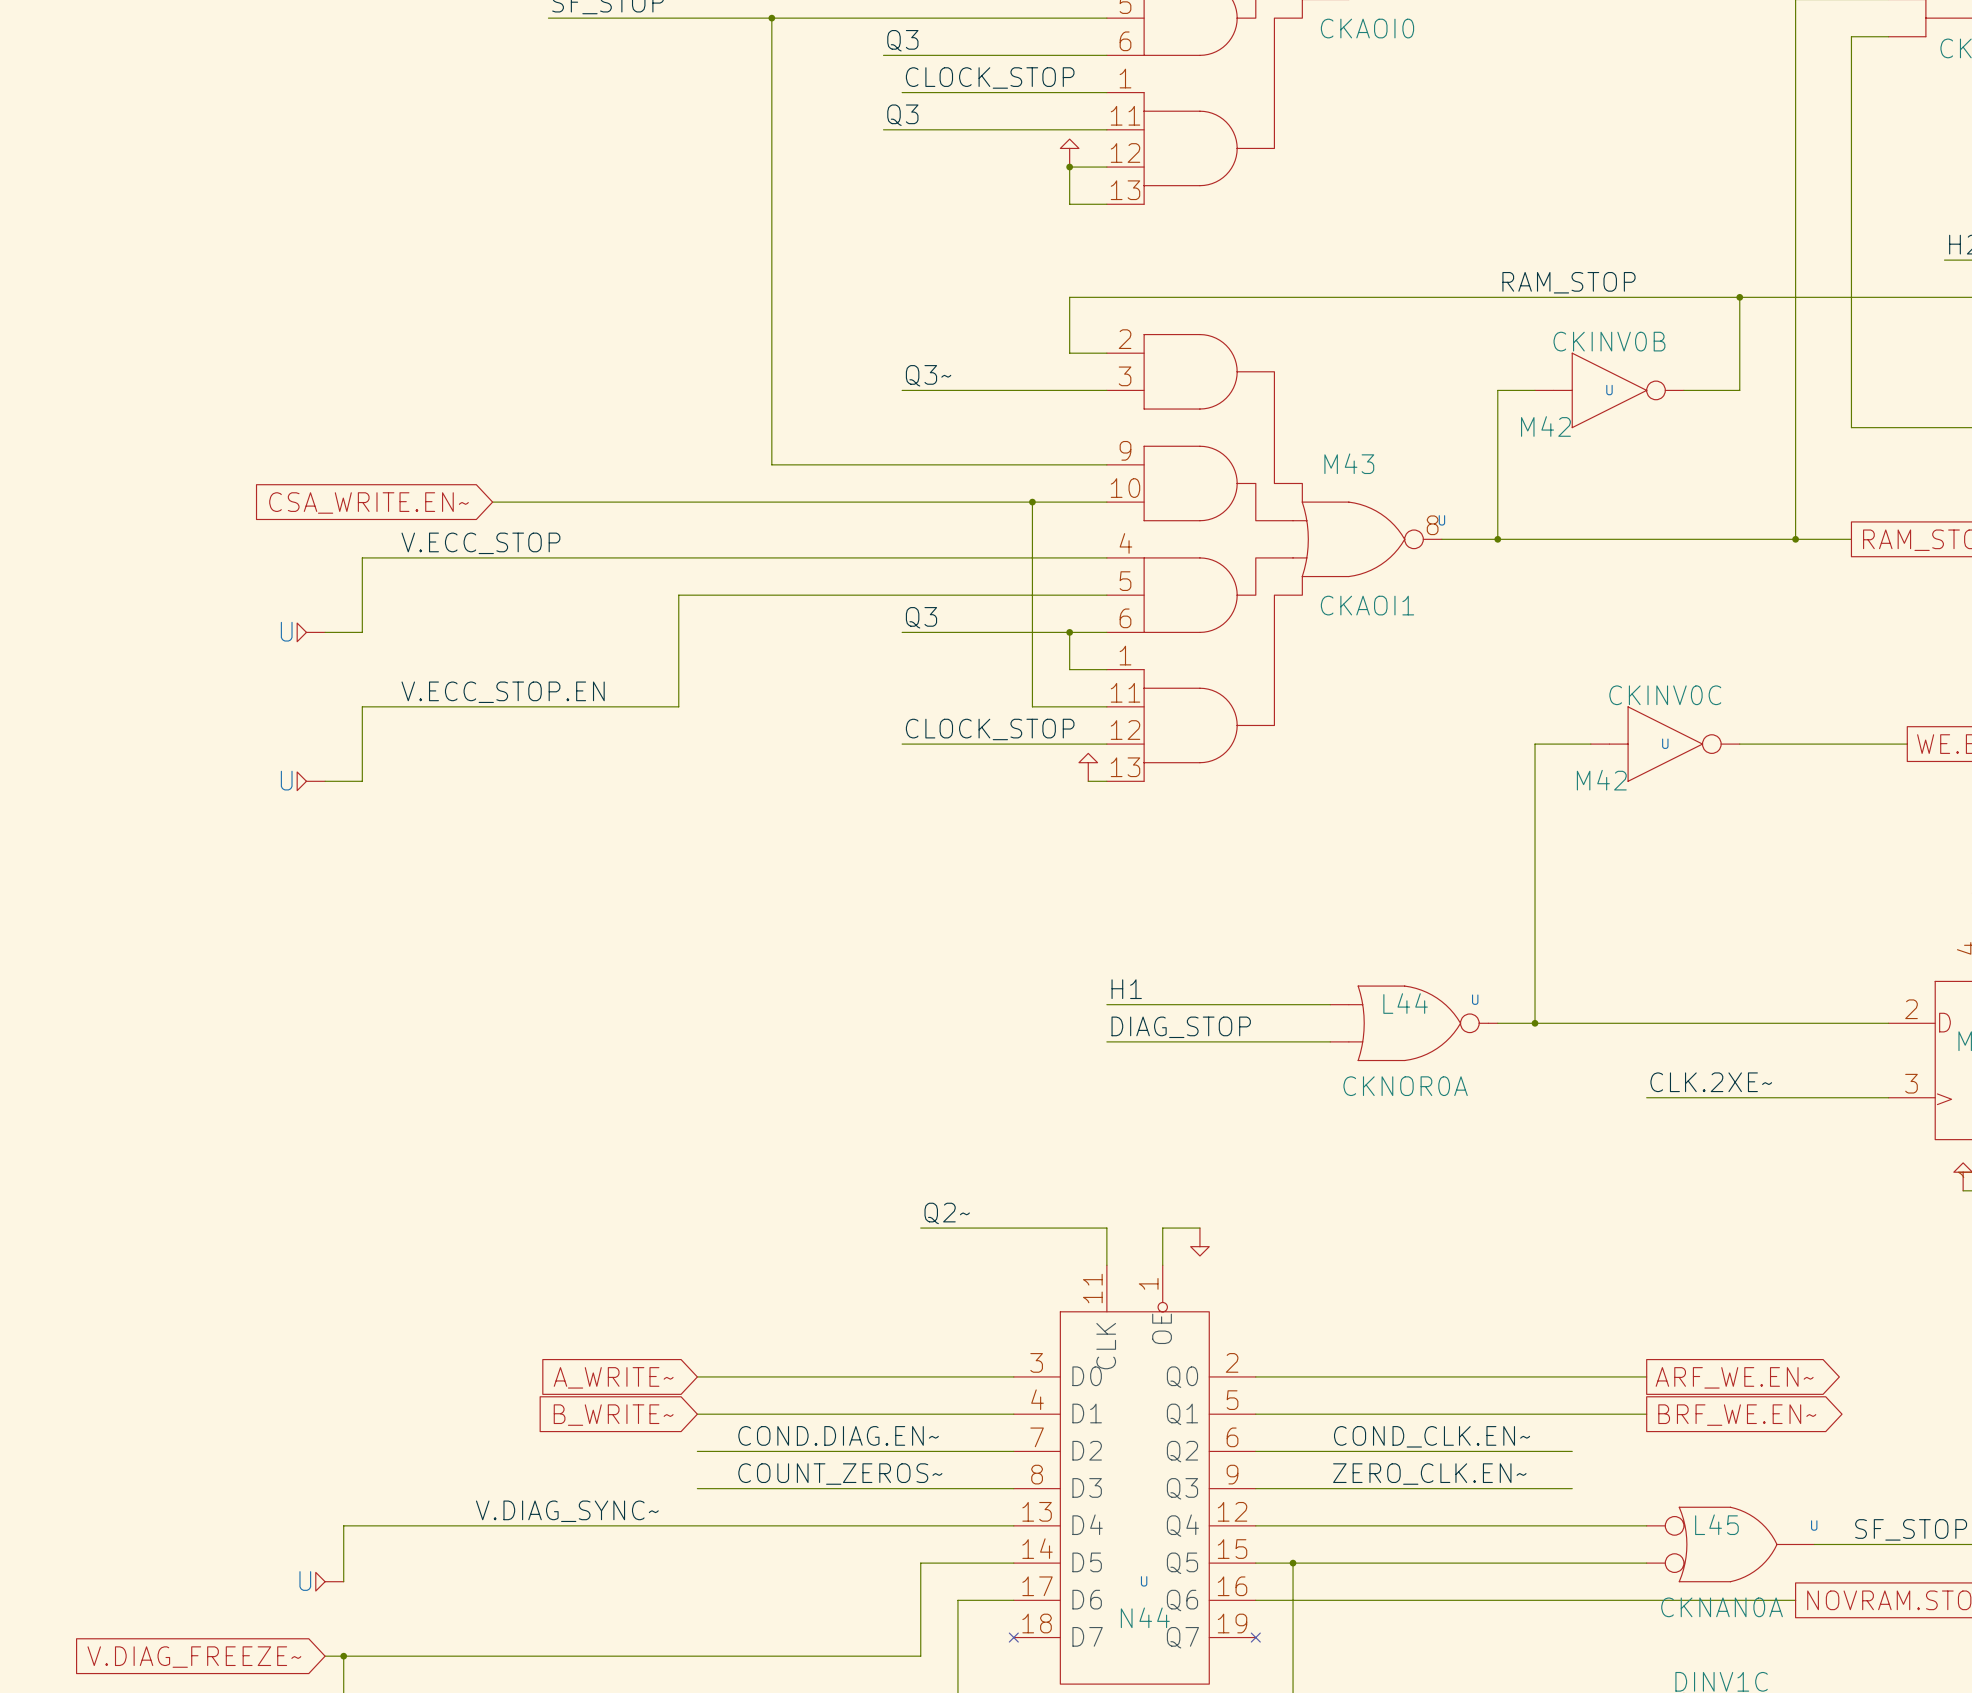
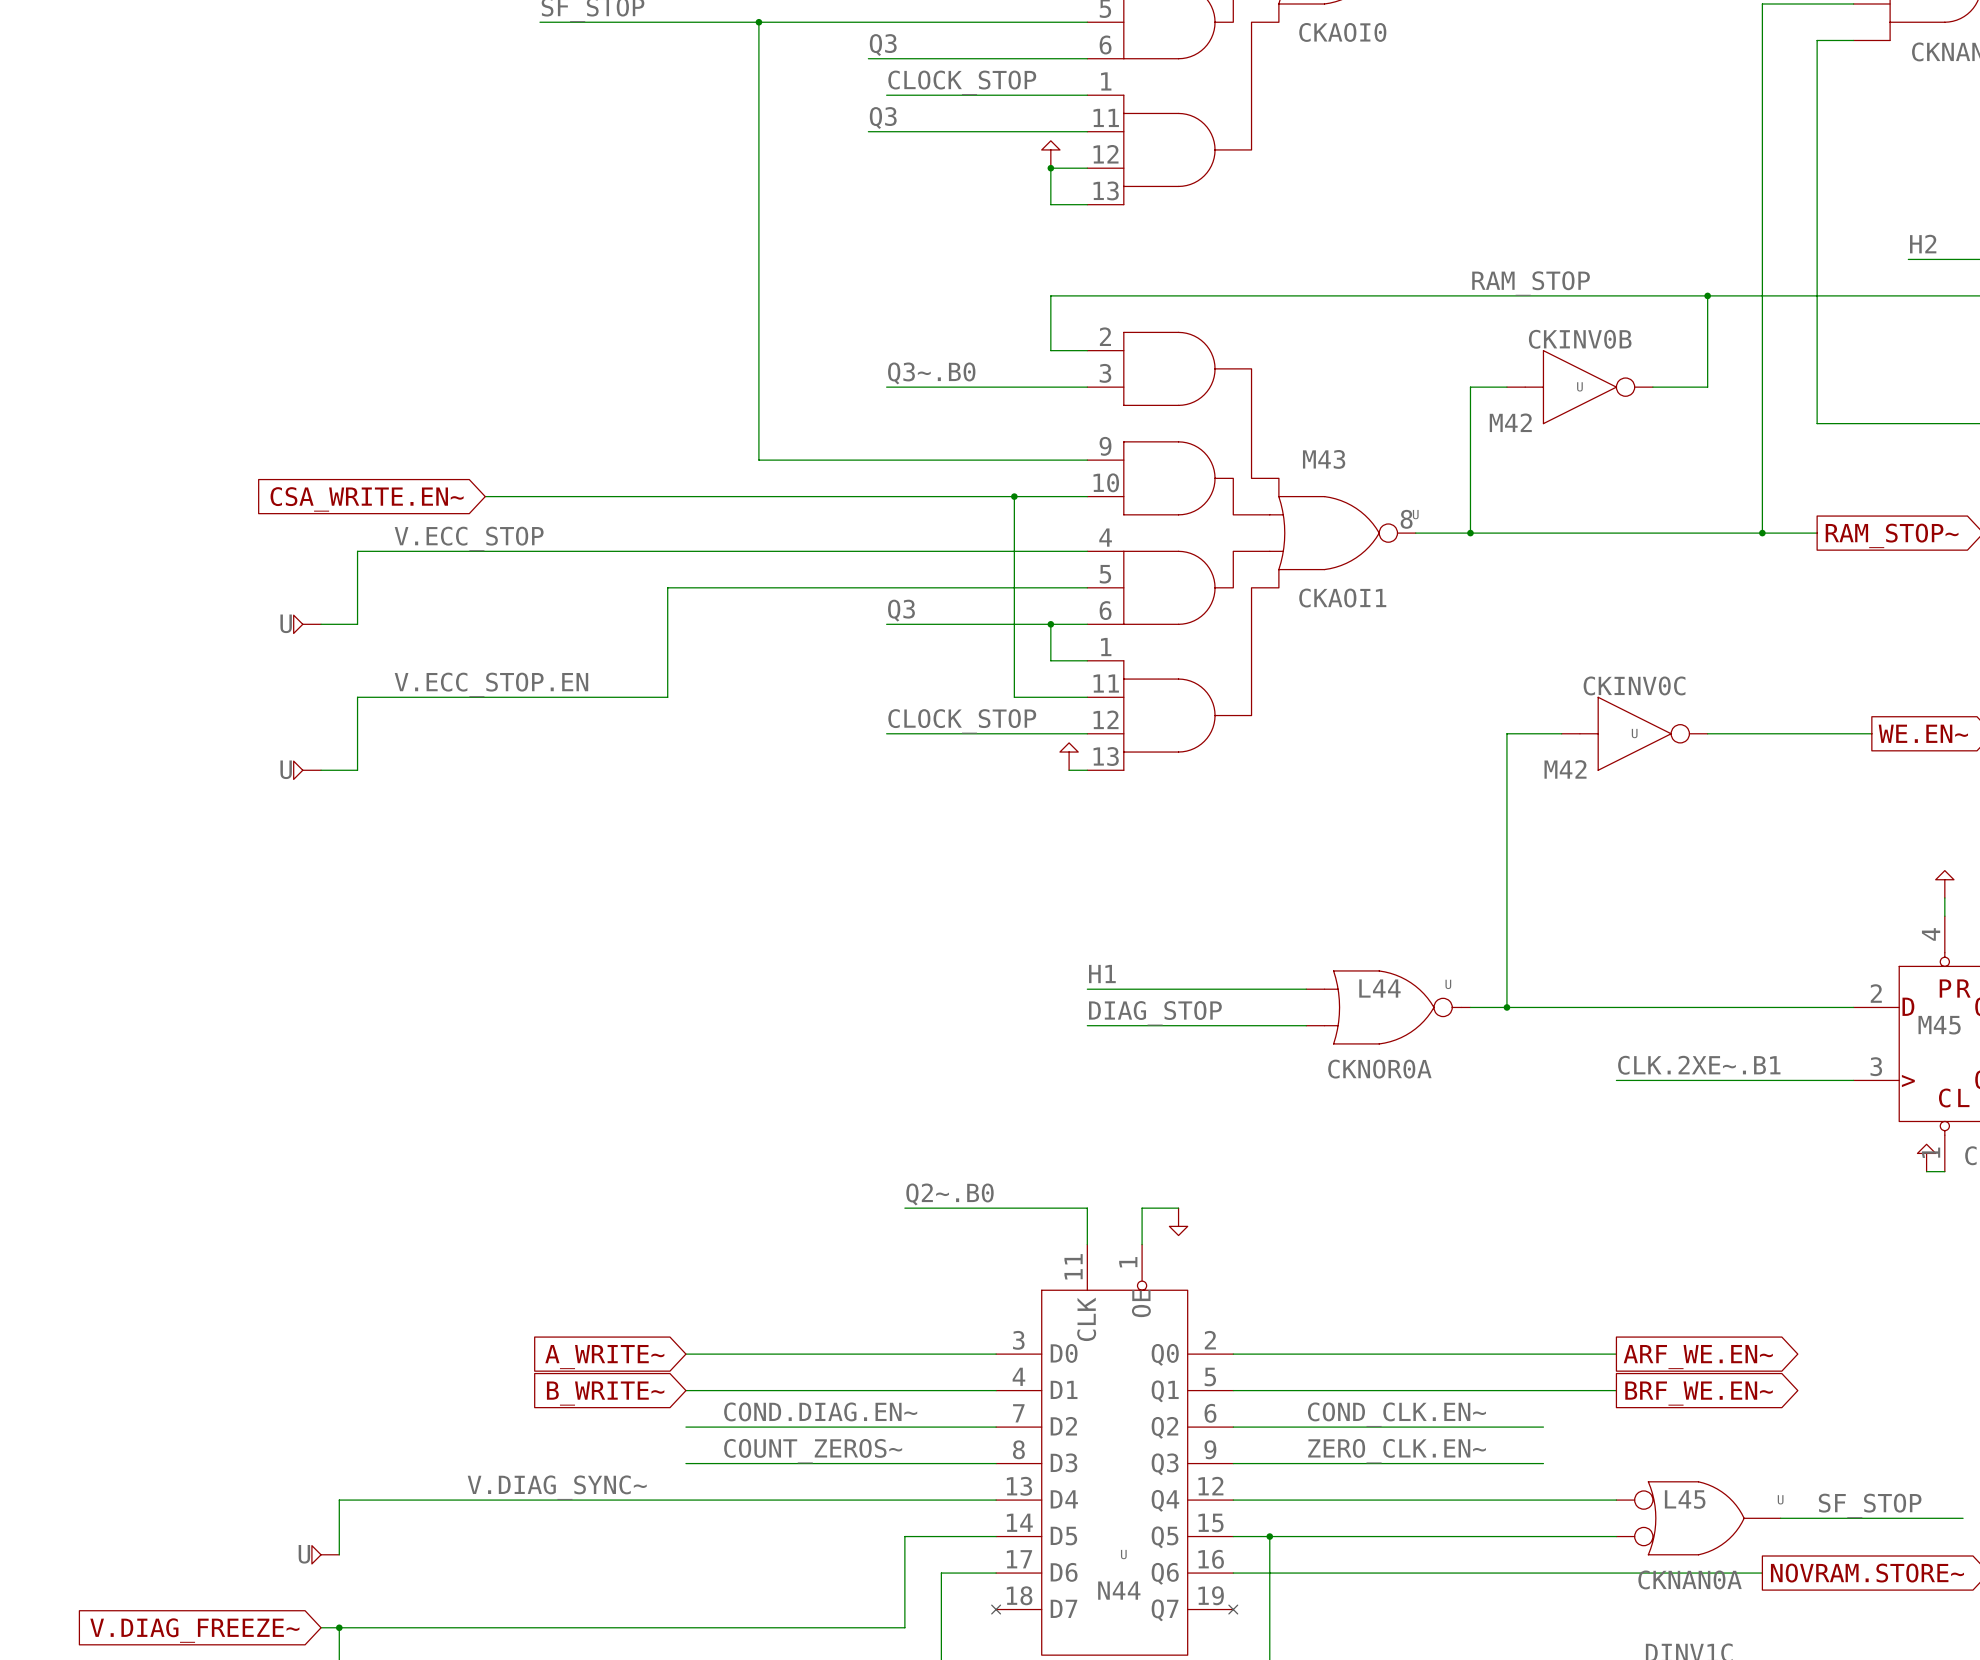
label: Q3~ (928, 375) -> Q3~.B0 (931, 373)
label: CLK.2XE~ (1711, 1082) -> CLK.2XE~.B1 (1699, 1065)
label: Q2~ (947, 1213) -> Q2~.B0 (949, 1194)

